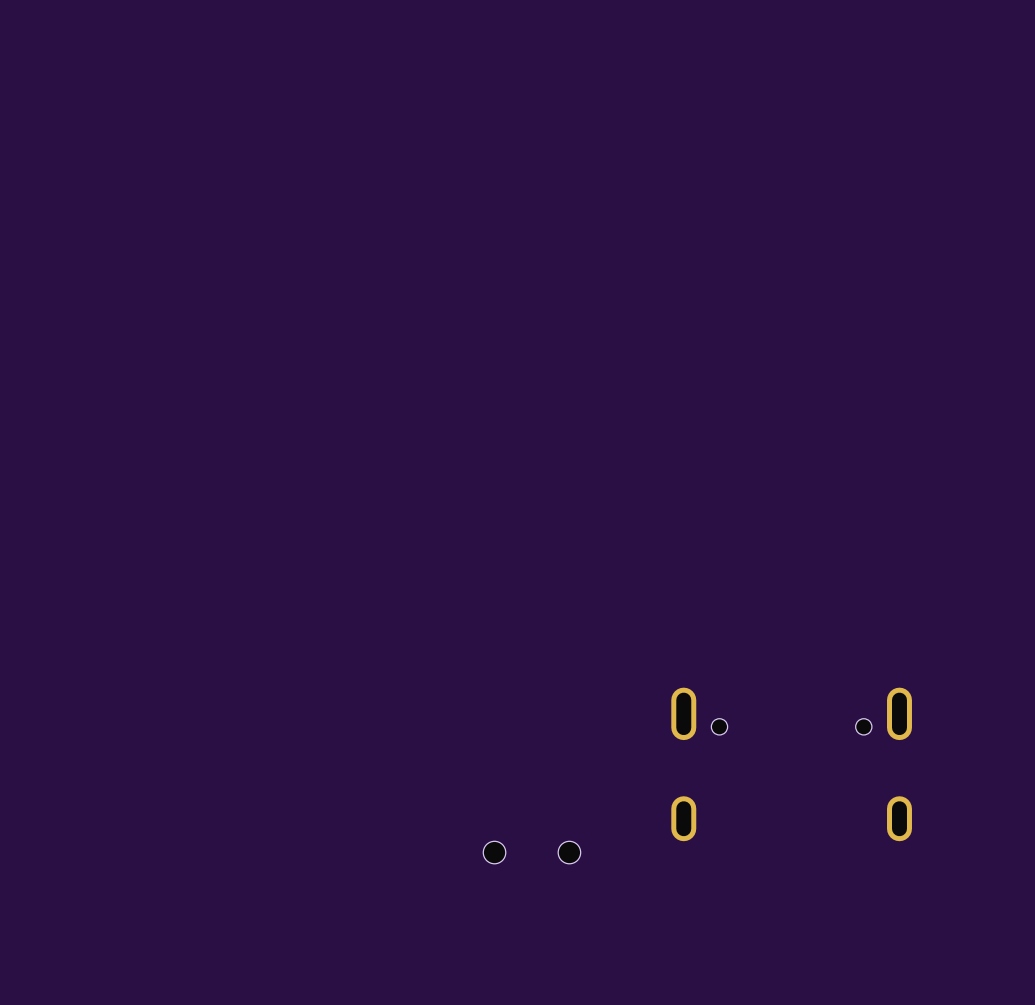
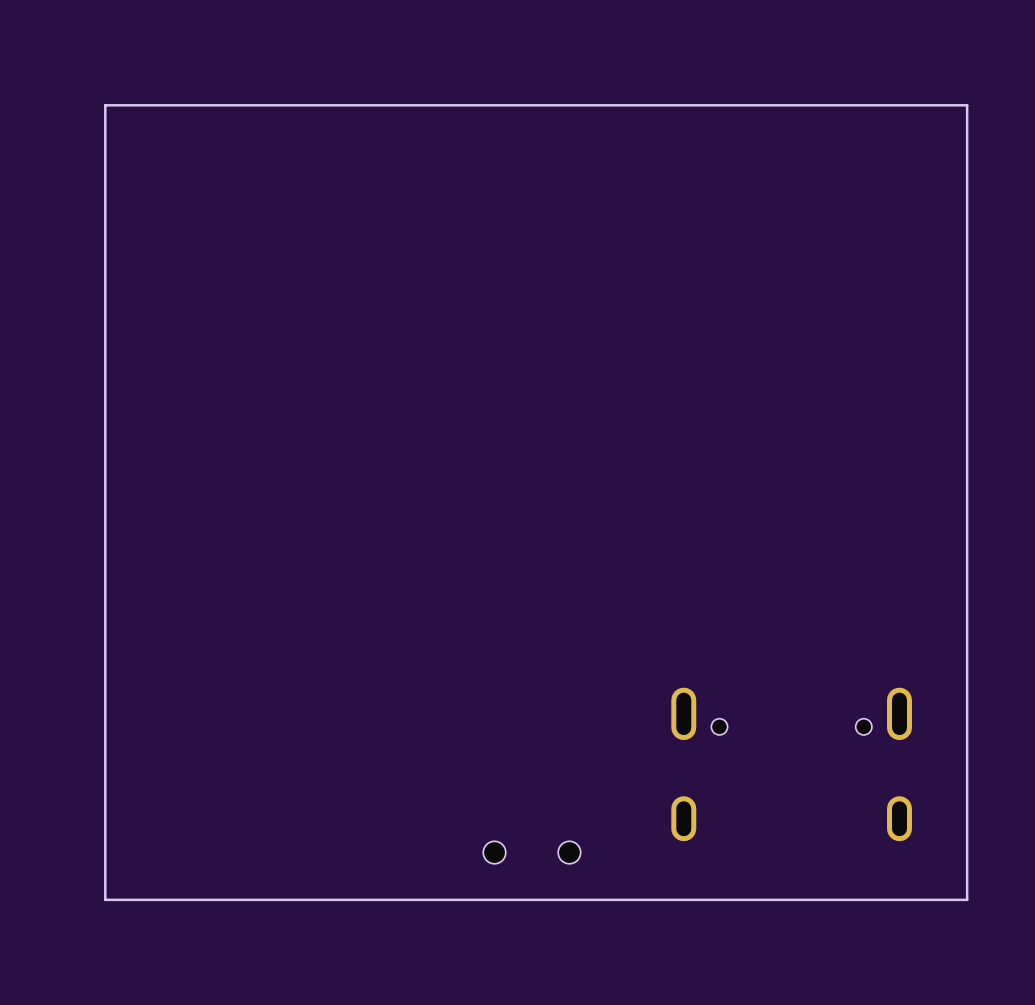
board edge: none -> (967, 105) (105, 105) (105, 899) (967, 899) (967, 105)

